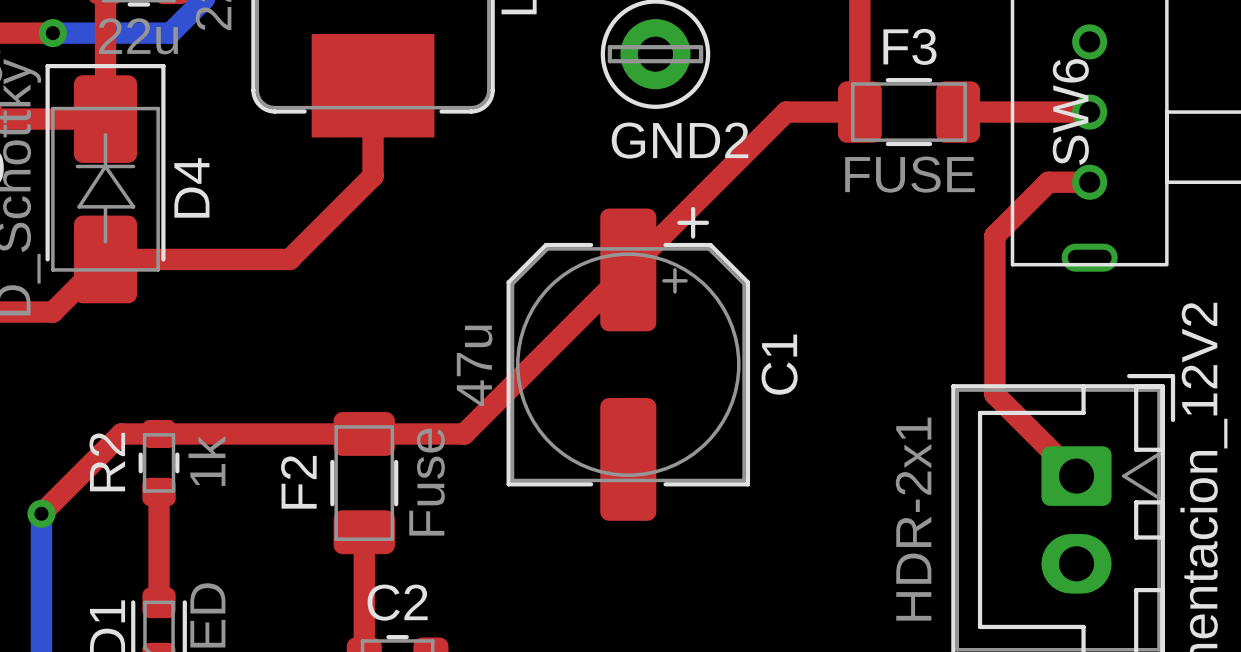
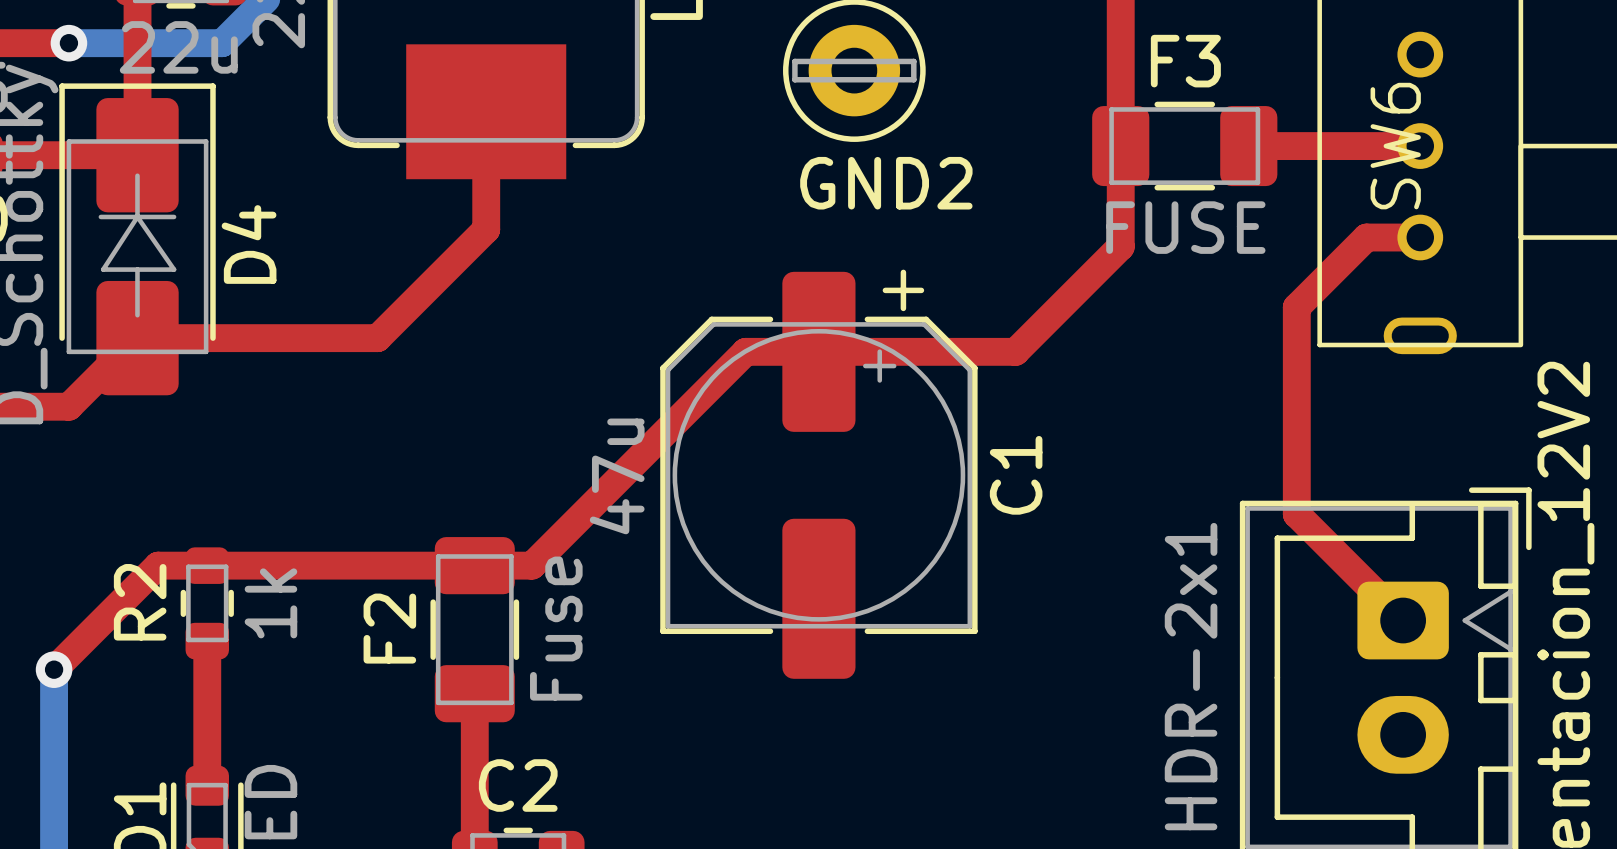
top track: (859, 112) (786, 112) (464, 433) (408, 433) -> (1120, 146) (1120, 246) (1015, 351) (745, 351) (531, 565)

